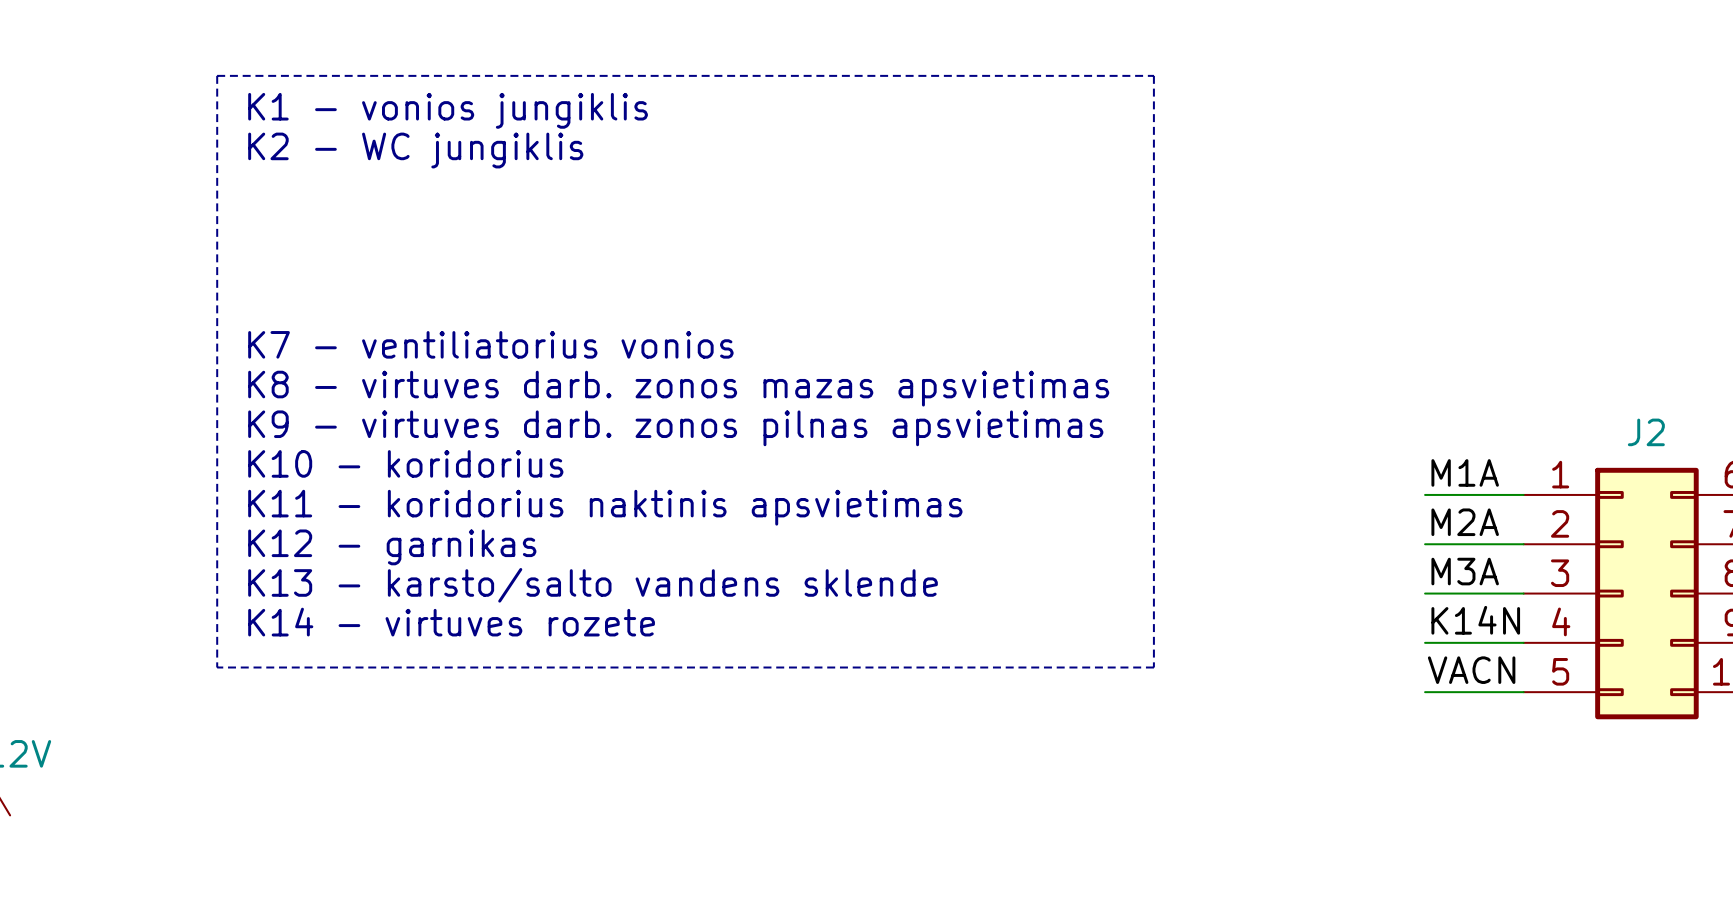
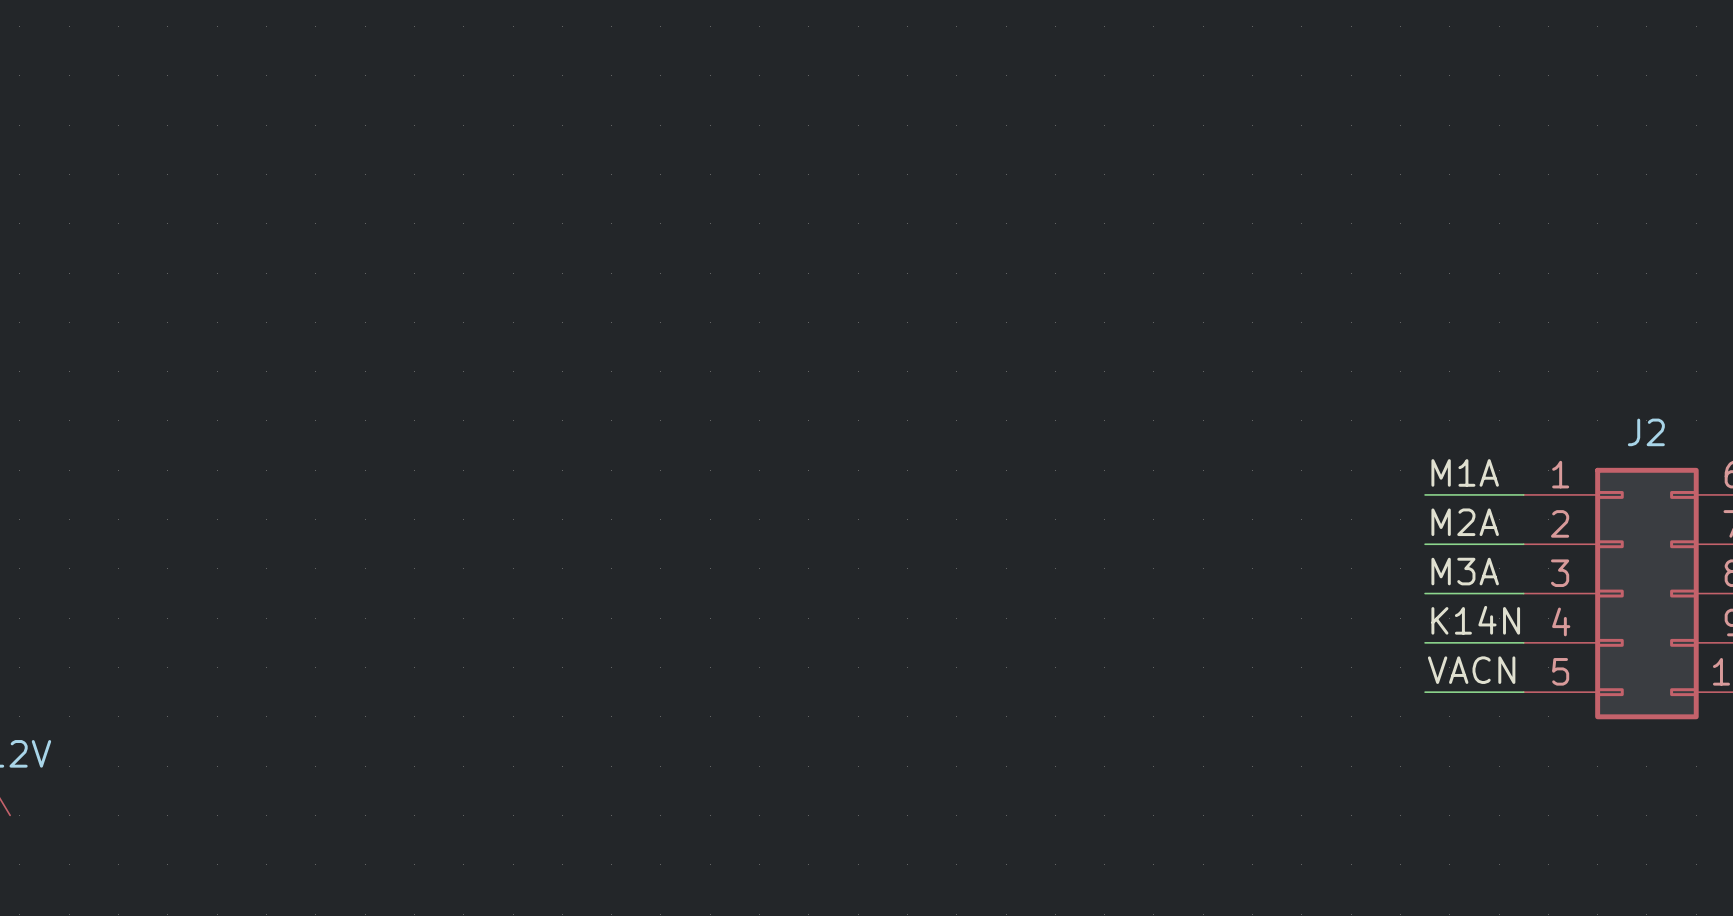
line: (217, 75) (1153, 75) (1153, 667) (217, 667) (217, 75) -> none
text: K1 - vonios jungiklis (448, 110) -> none
text: K2 - WC jungiklis (415, 150) -> none
text: K7 - ventiliatorius vonios (490, 344) -> none
text: K8 - virtuves darb. zonos mazas apsvietimas (678, 388) -> none
text: K9 - virtuves darb. zonos pilnas apsvietimas (675, 428) -> none
text: K10 - koridorius (405, 463) -> none
text: K11 - koridorius naktinis apsvietimas (605, 507) -> none
text: K12 - garnikas (392, 547) -> none
text: K13 - karsto/salto vandens sklende (593, 585) -> none
text: K14 - virtuves rozete (451, 622) -> none

